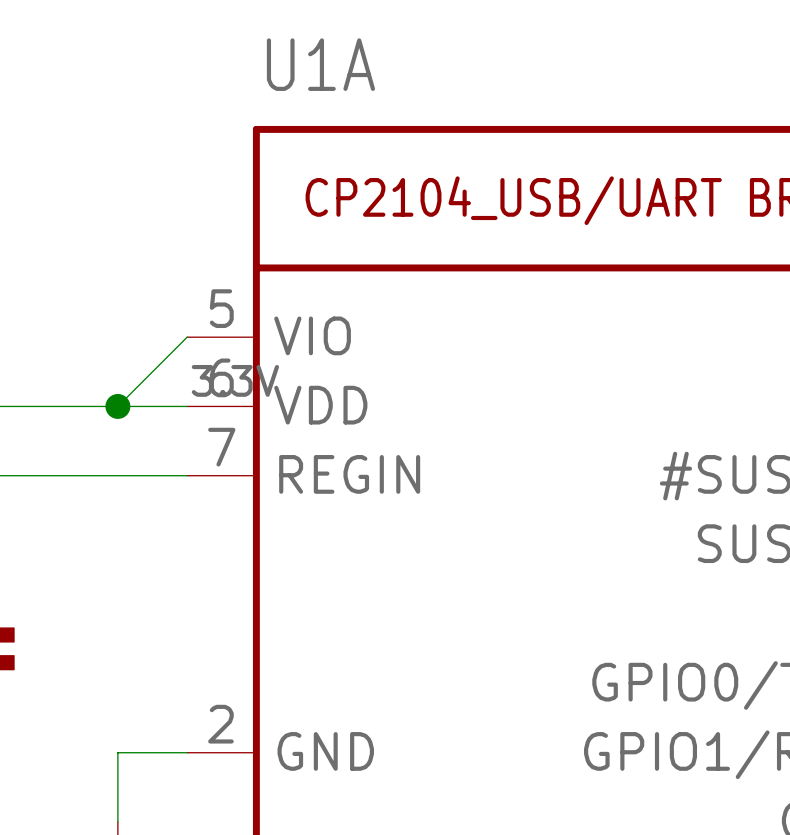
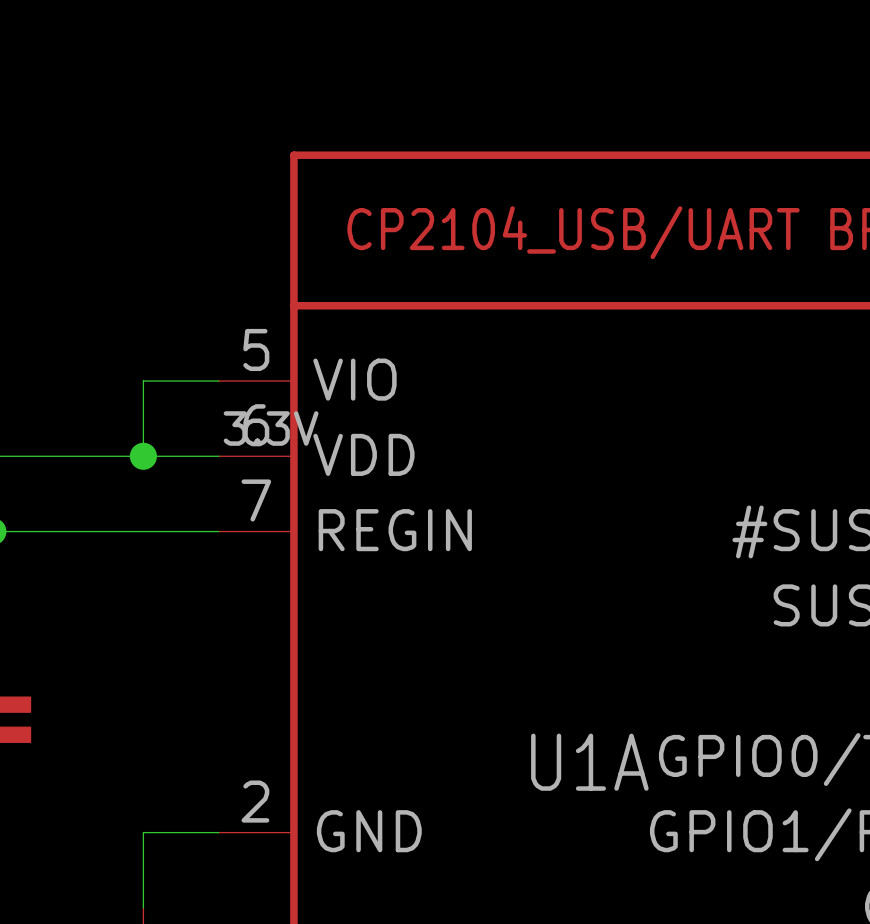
U1A name position: U1A (320, 64) -> U1A (589, 762)
wire: (187, 337) (117, 406) -> (218, 381) (143, 381) (143, 456)

